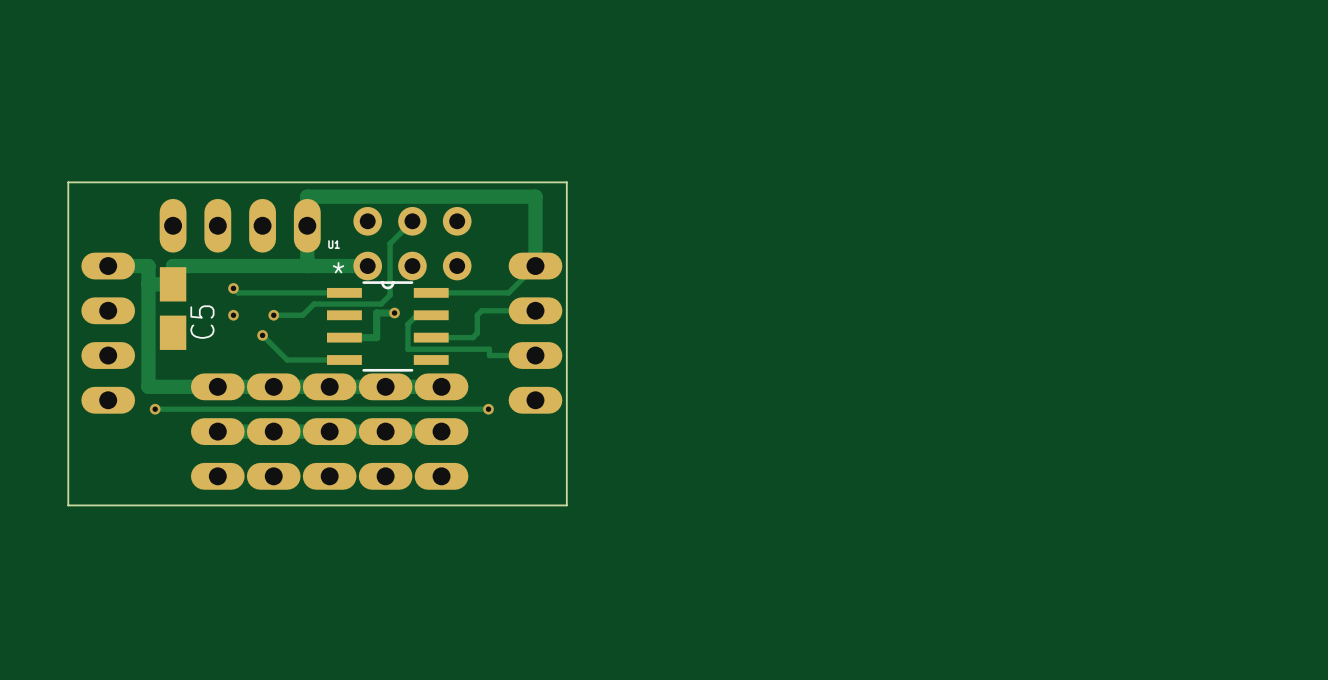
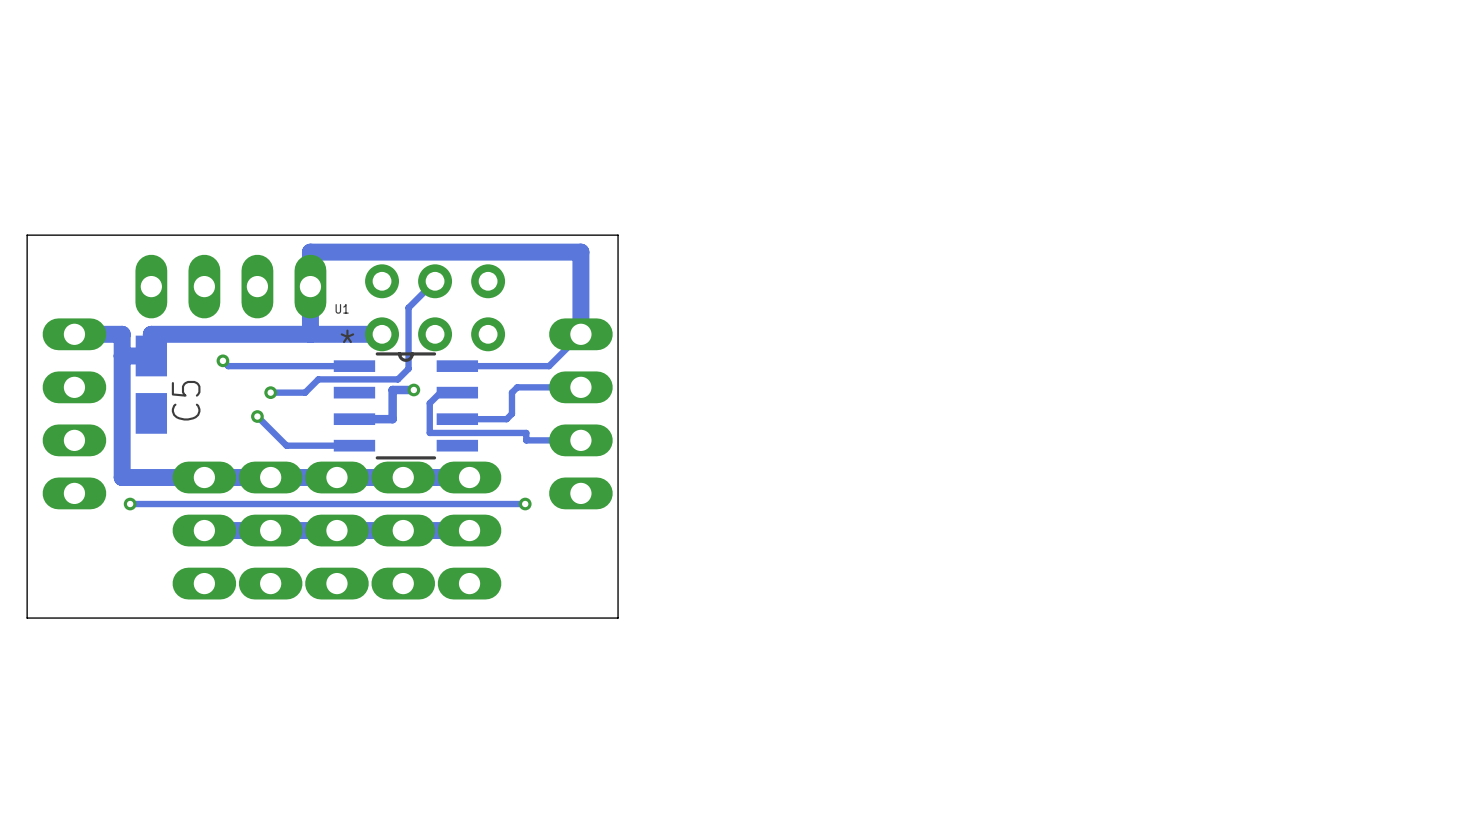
via: (233, 315) -> none

